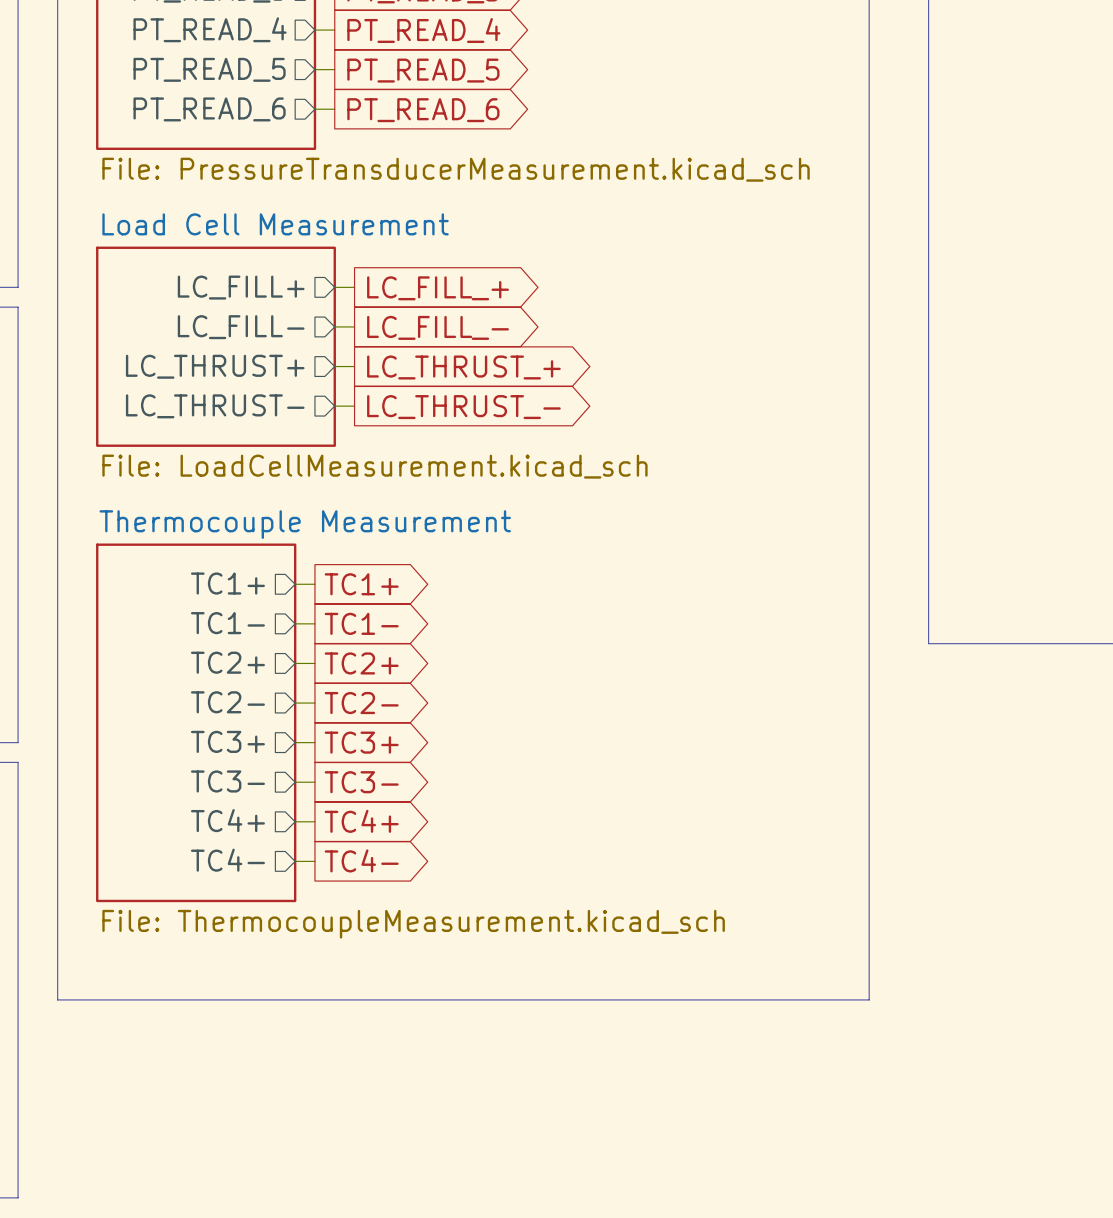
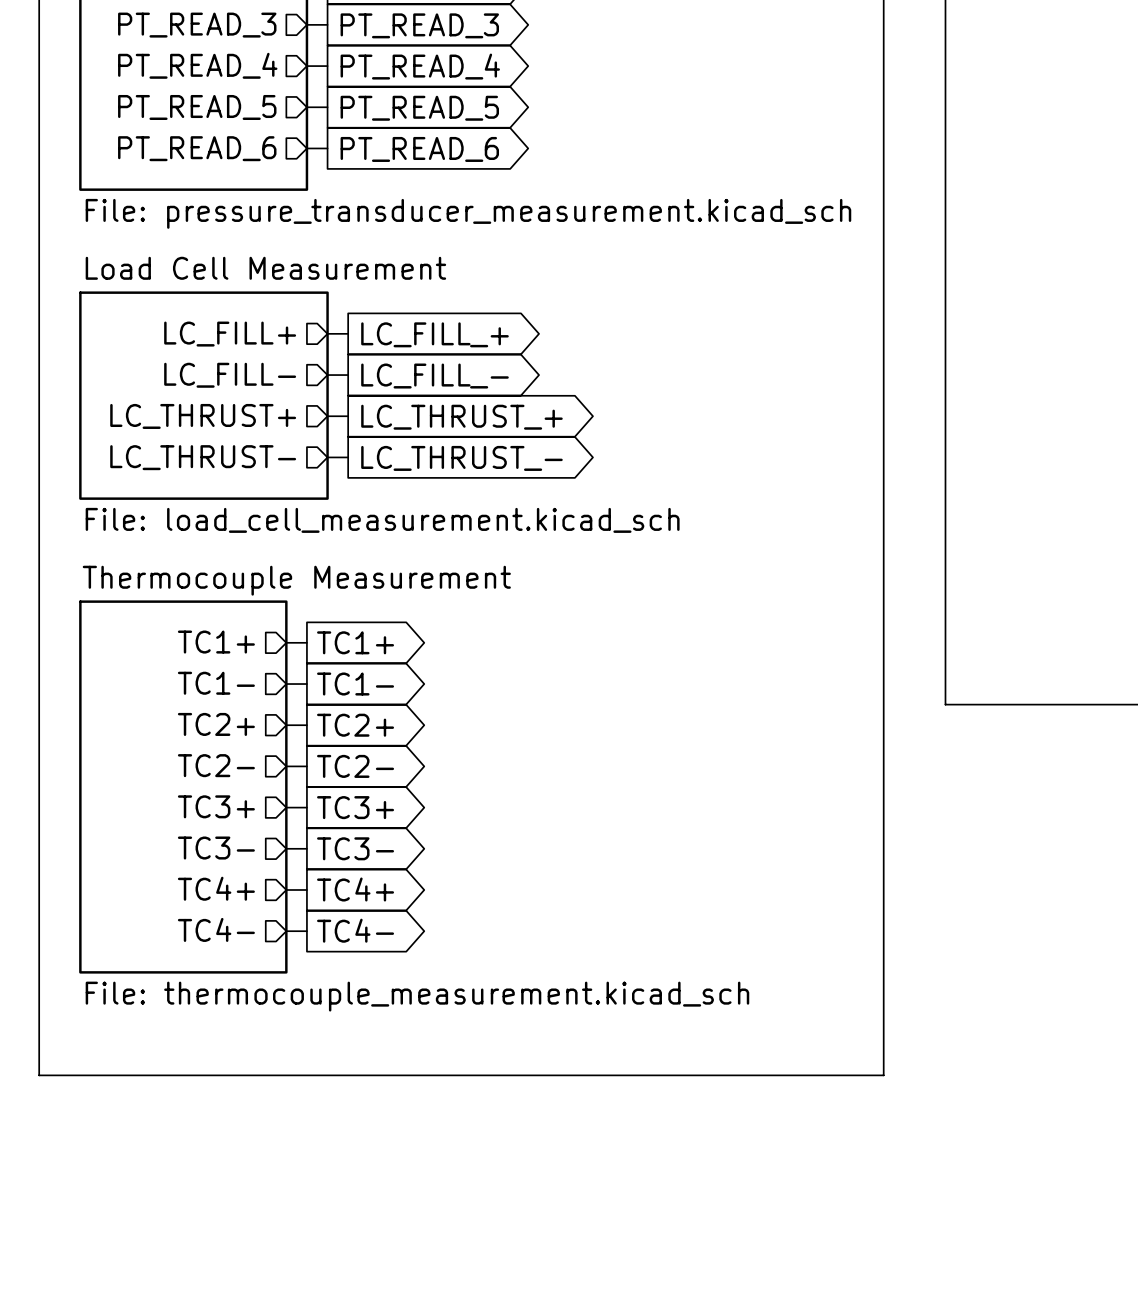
sheet value: File: PressureTransducerMeasurement.kicad_sch (456, 169) -> File: pressure_transducer_measurement.kicad_sch (468, 213)
sheet Load Cell Measurement value: File: LoadCellMeasurement.kicad_sch (374, 466) -> File: load_cell_measurement.kicad_sch (382, 520)
sheet Thermocouple Measurement value: File: ThermocoupleMeasurement.kicad_sch (413, 924) -> File: thermocouple_measurement.kicad_sch (417, 996)

